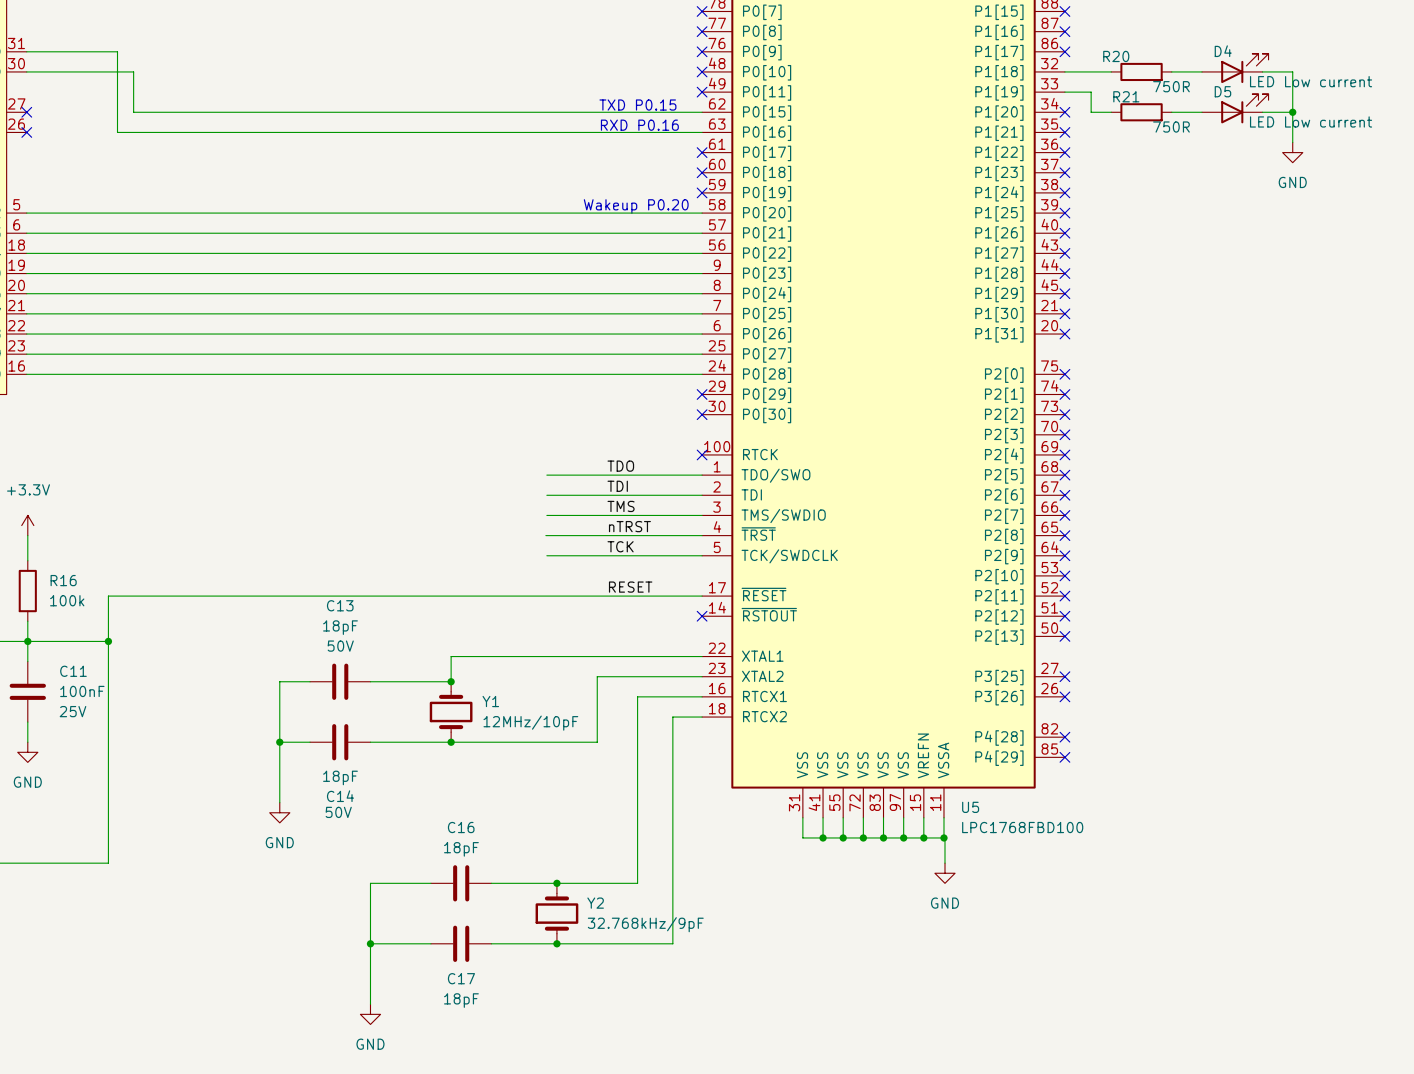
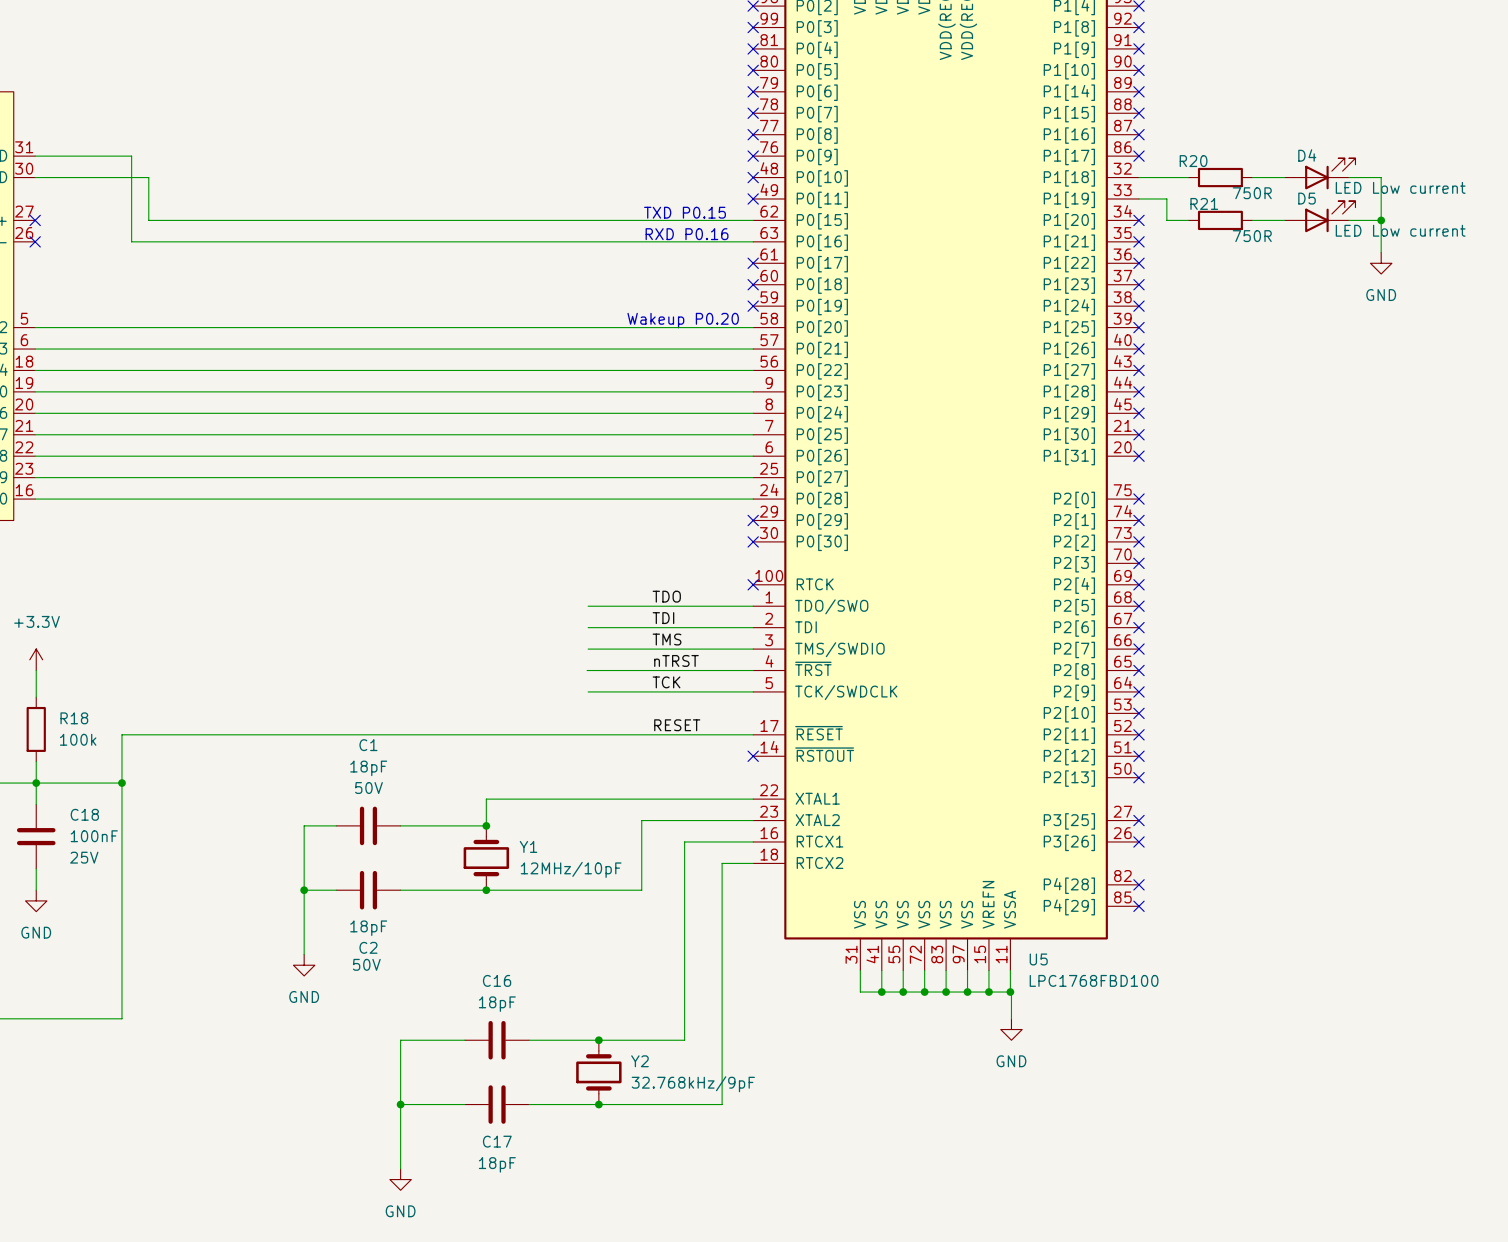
R16 name: R16 (63, 580) -> R18 (74, 718)
C13 name: C13 (340, 605) -> C1 (368, 745)
C11 name: C11 (73, 671) -> C18 (84, 814)
C14 name: C14 (340, 796) -> C2 (368, 947)

